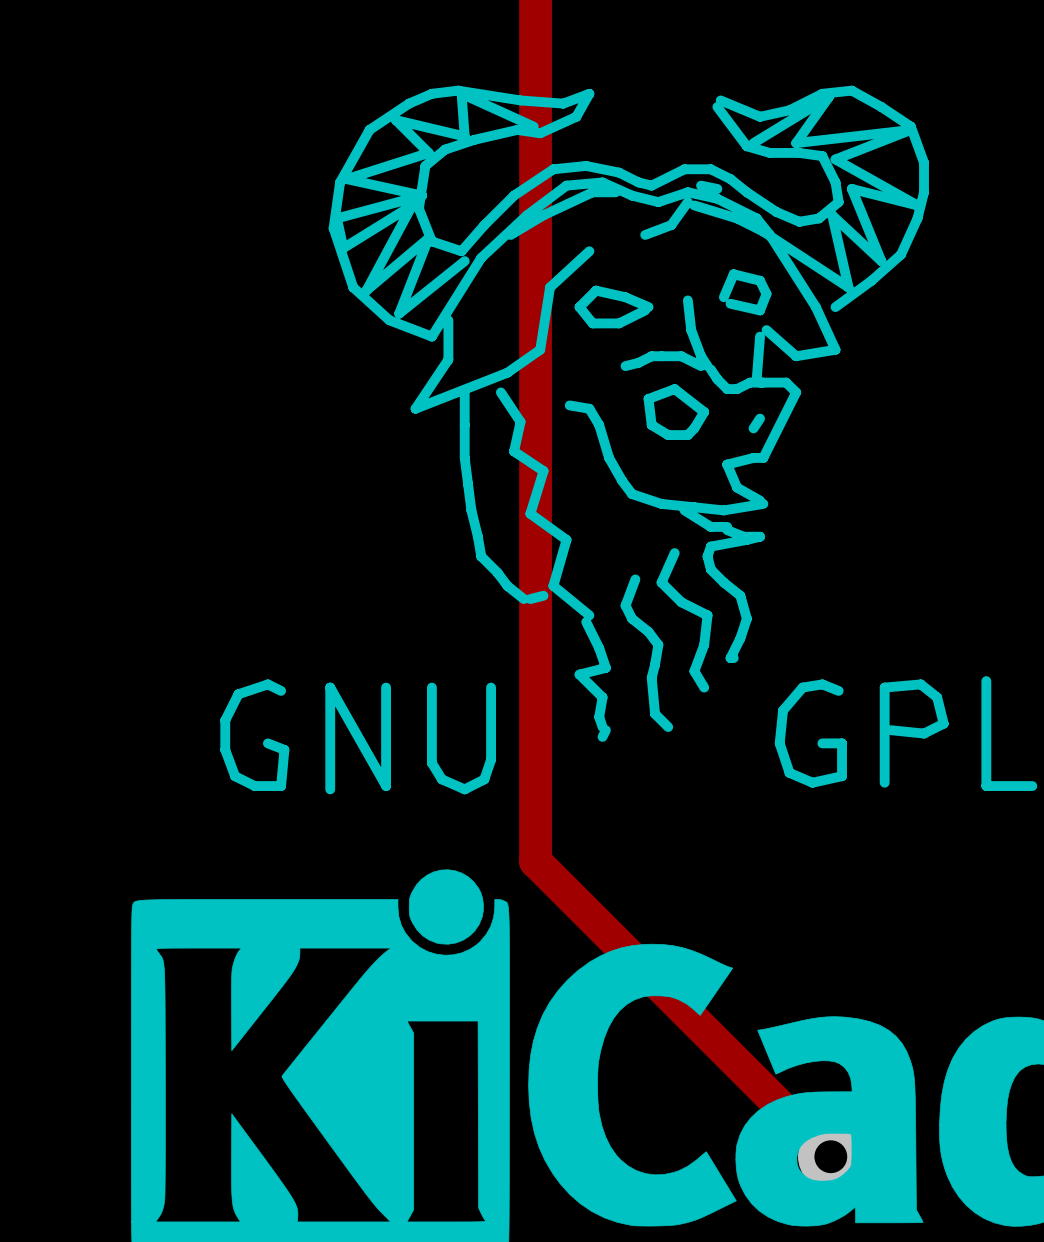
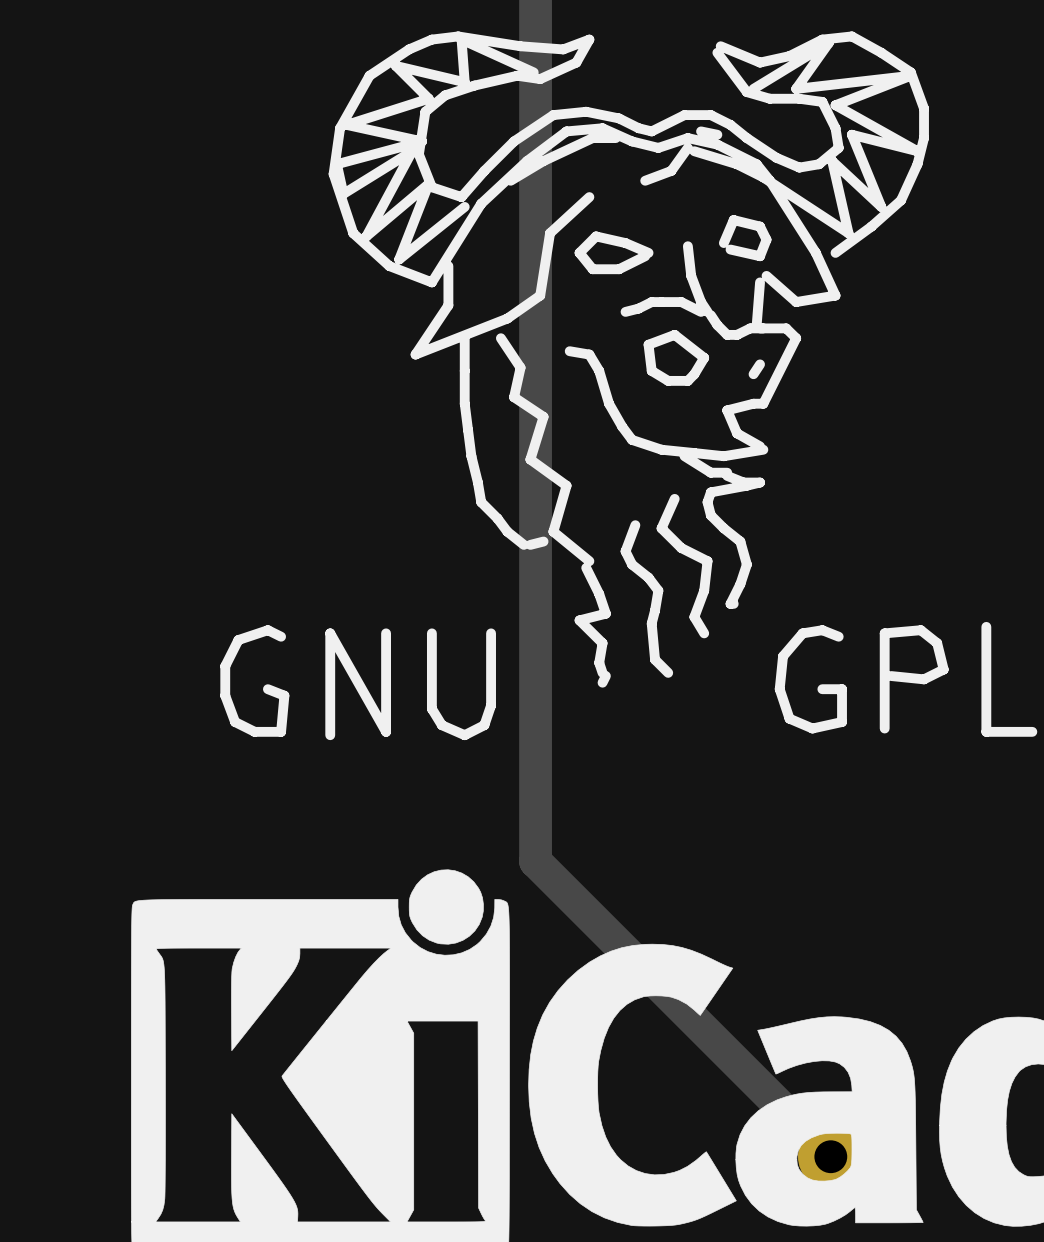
drawing position: (628, 440) -> (628, 385)

